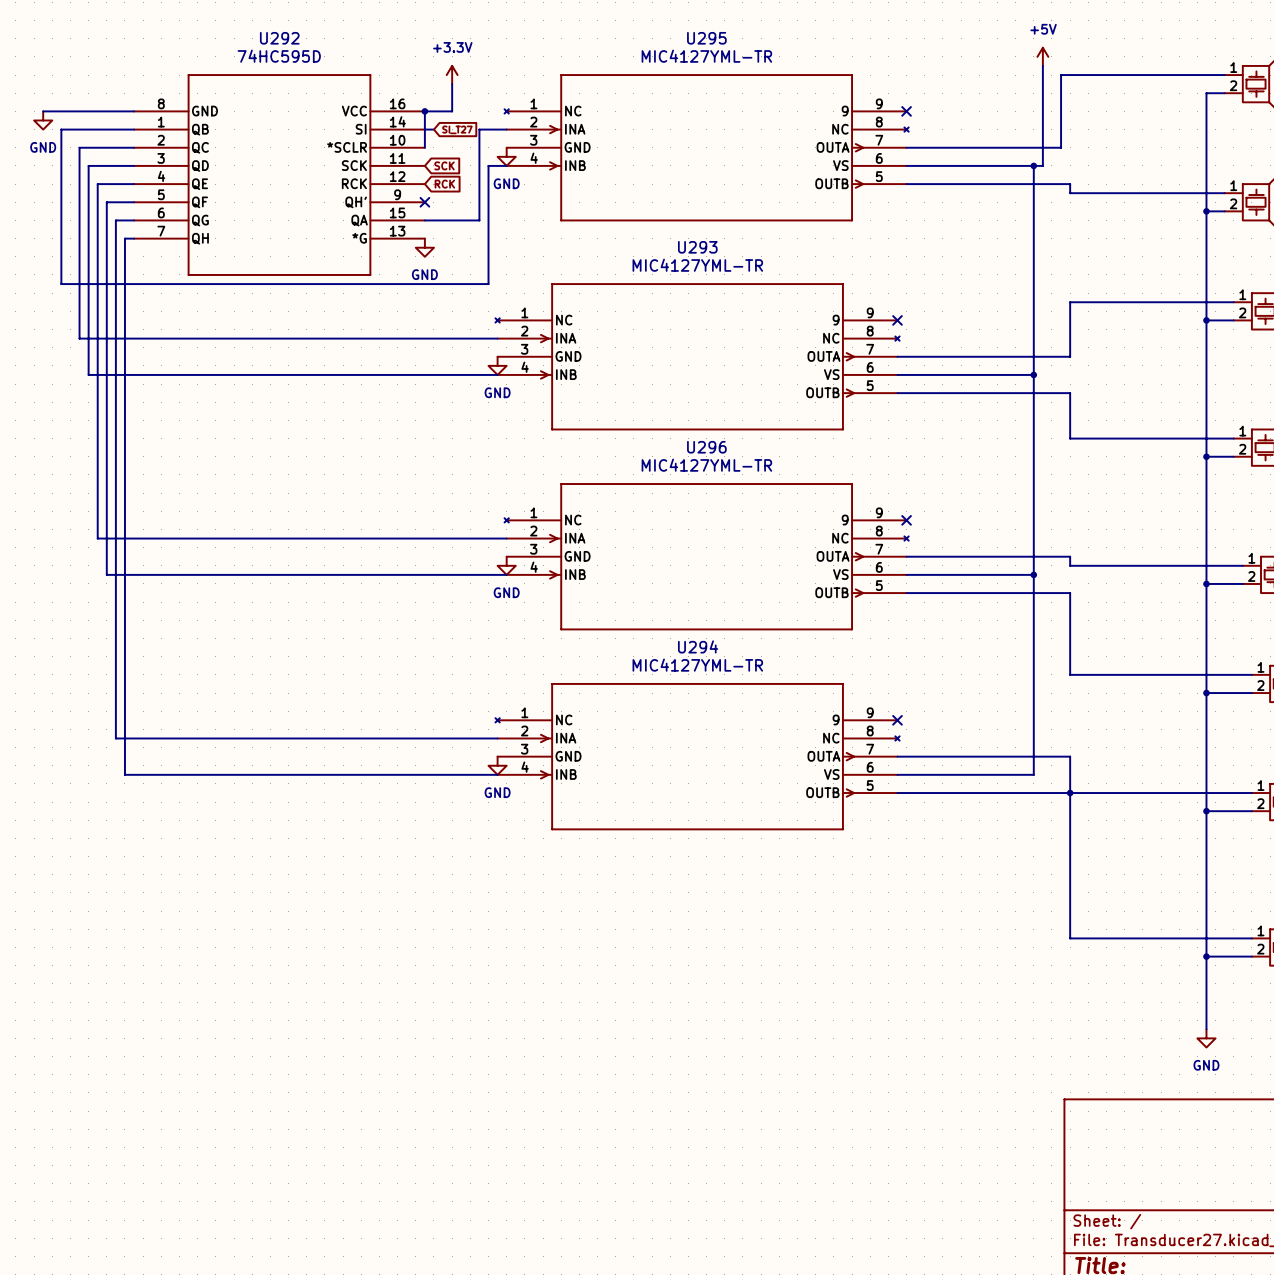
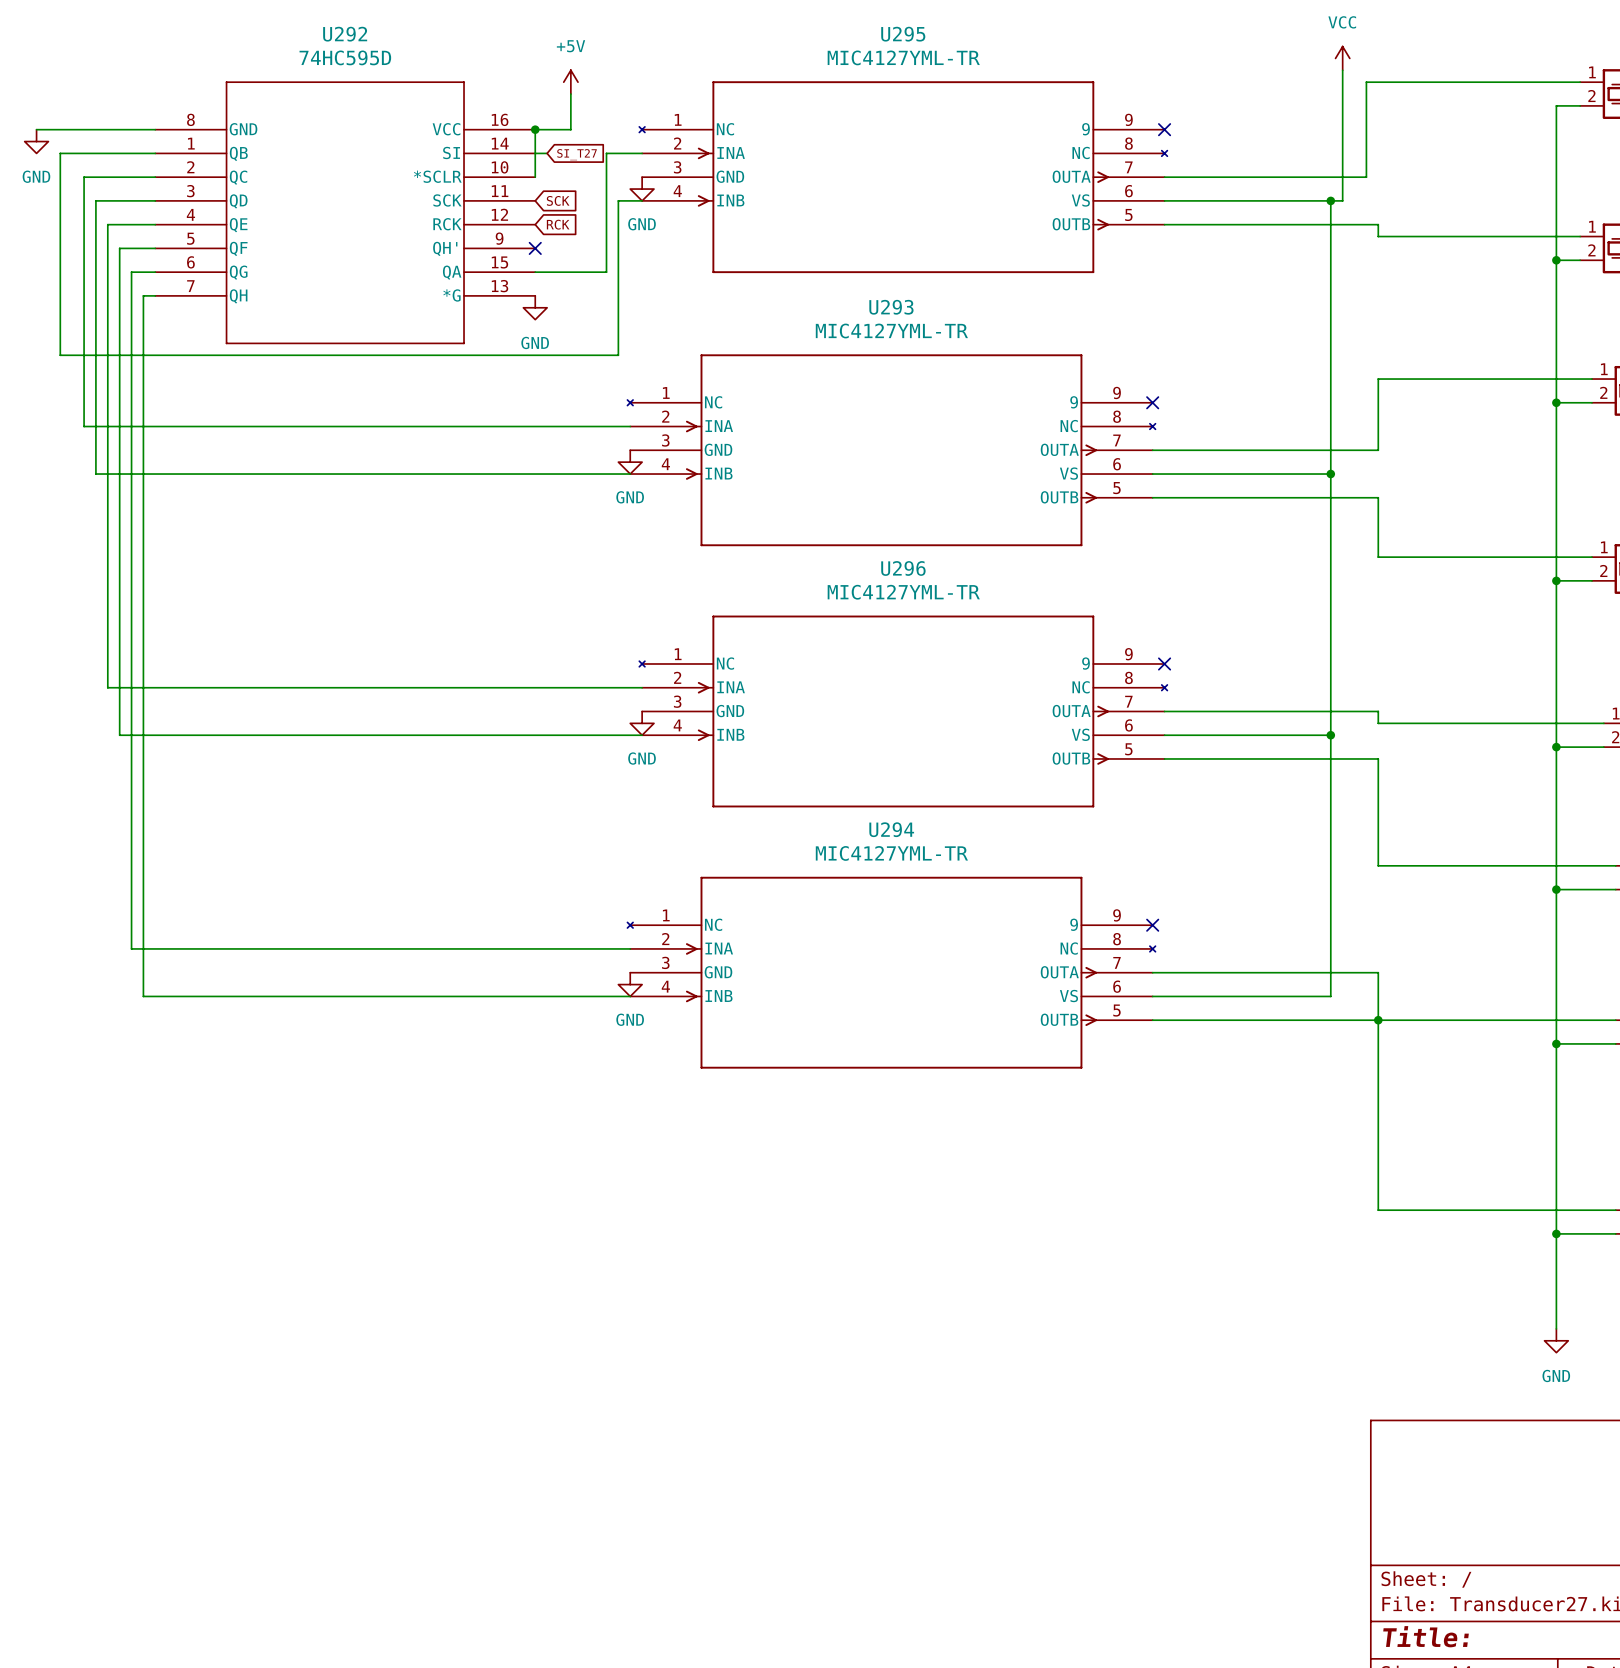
power symbol: +5V (1042, 56) -> VCC (1342, 58)
power symbol: +3.3V (452, 75) -> +5V (570, 82)

